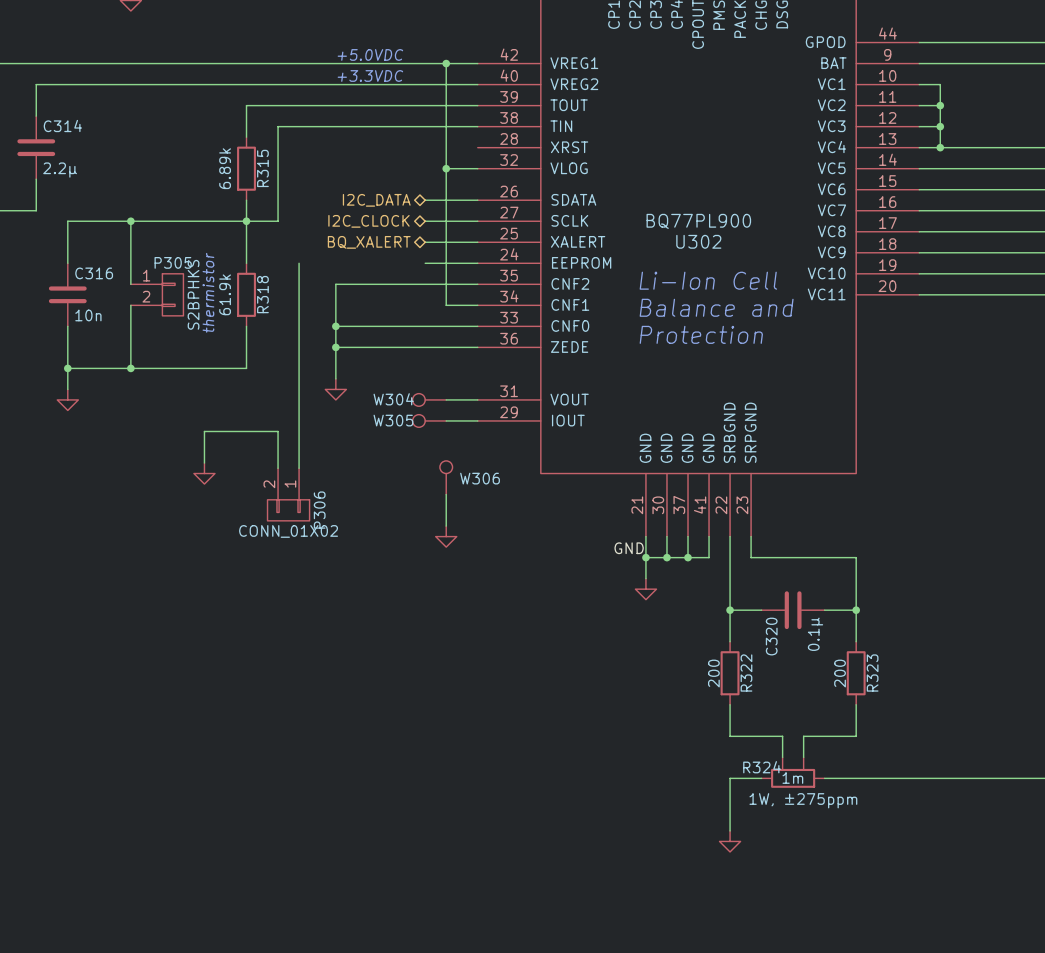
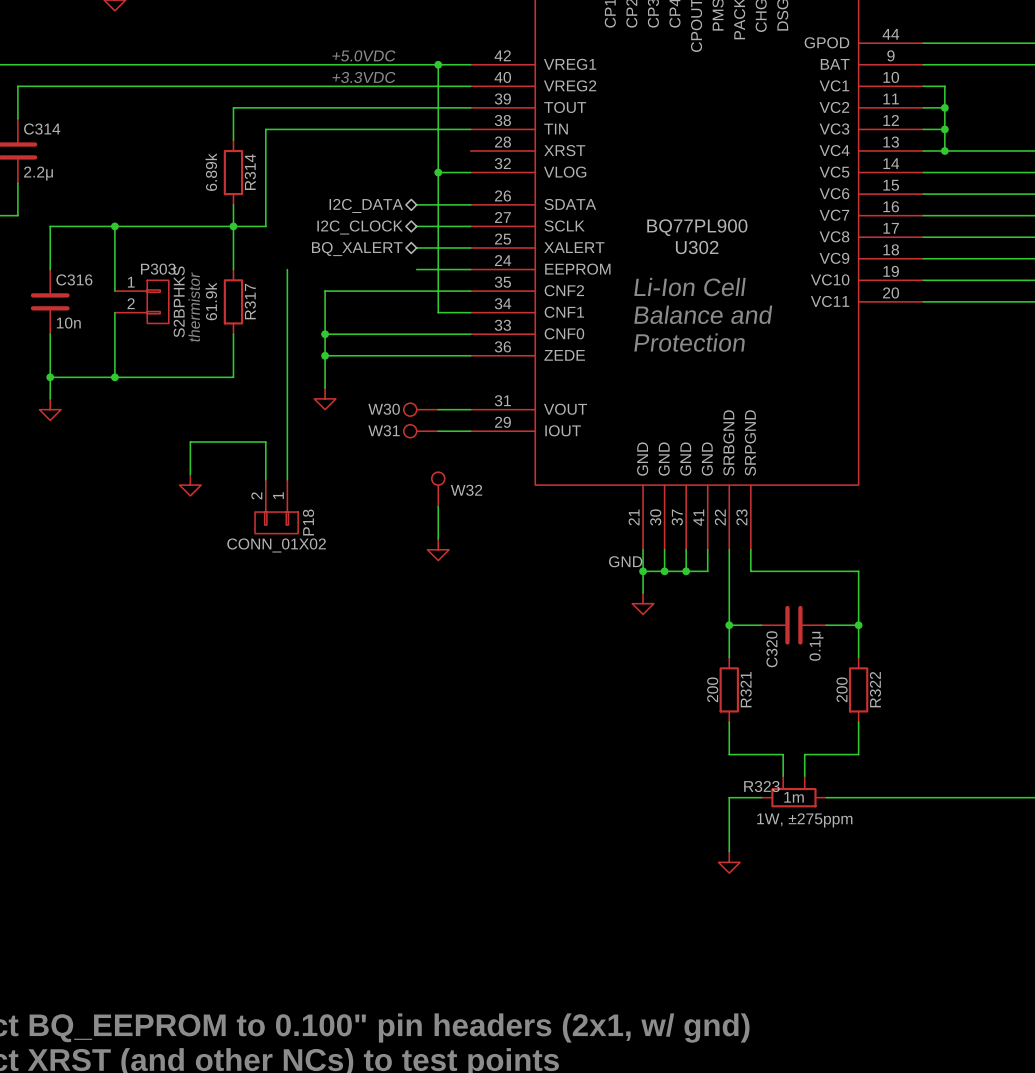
R315 name: R315 (262, 168) -> R314 (250, 172)
P305 name: P305 (173, 262) -> P303 (158, 269)
R318 name: R318 (262, 294) -> R317 (250, 301)
W304 name: W304 (393, 399) -> W30 (384, 409)
W305 name: W305 (393, 420) -> W31 (384, 430)
W306 name: W306 (480, 478) -> W32 (466, 490)
P306 name: P306 (319, 510) -> P18 (308, 522)
R322 name: R322 (746, 673) -> R321 (746, 689)
R323 name: R323 (872, 673) -> R322 (875, 689)
R324 name: R324 (762, 767) -> R323 (761, 786)

